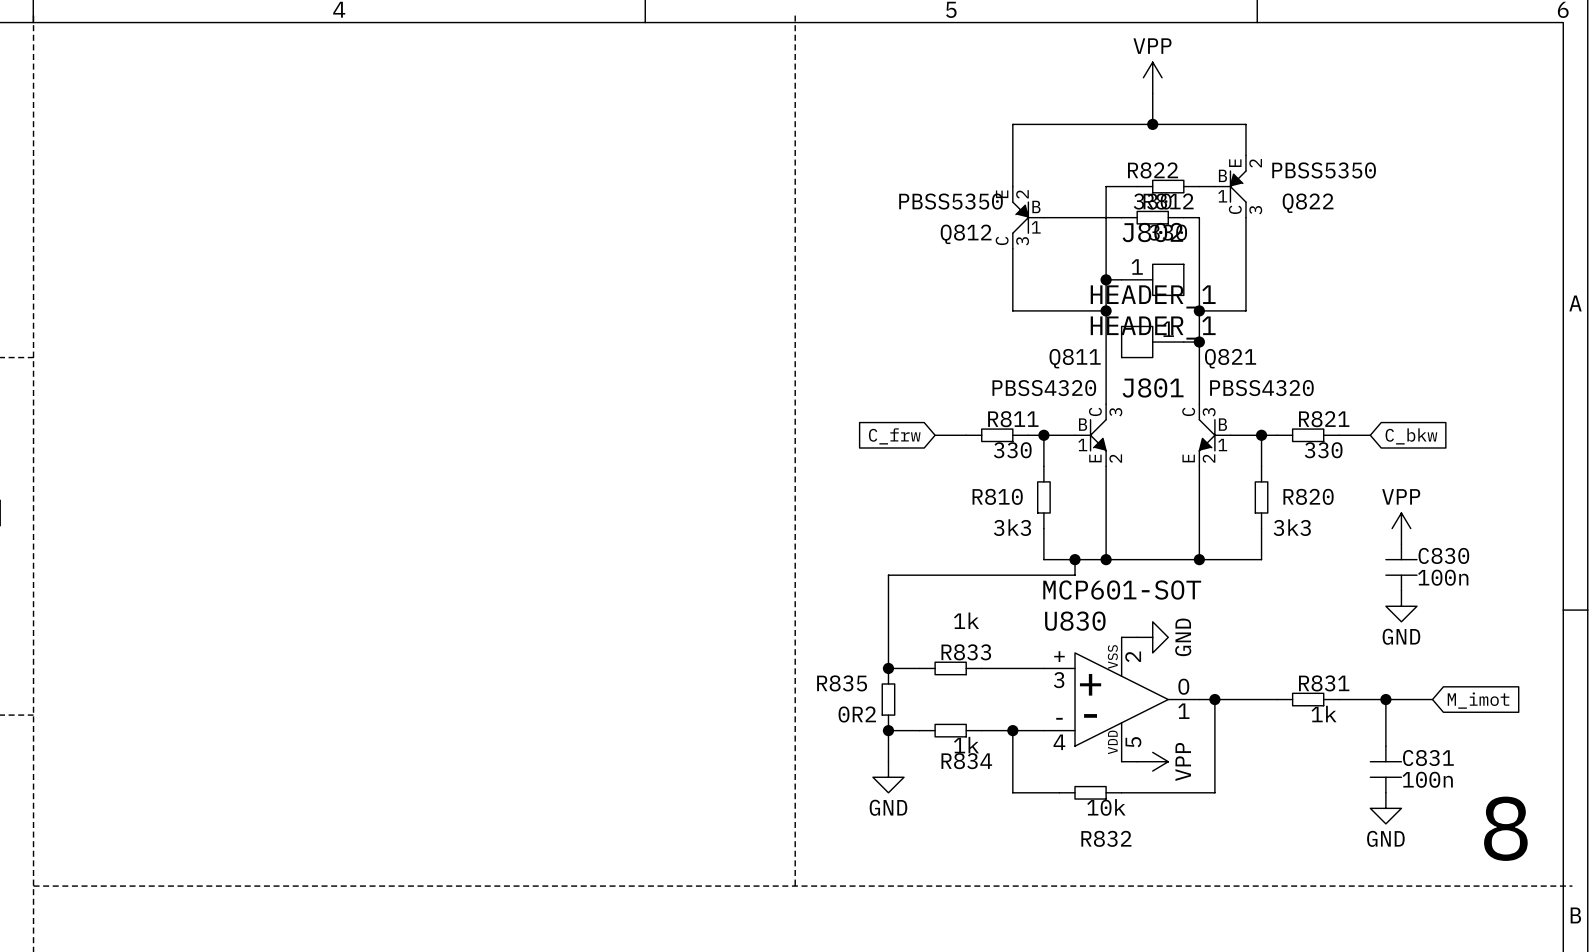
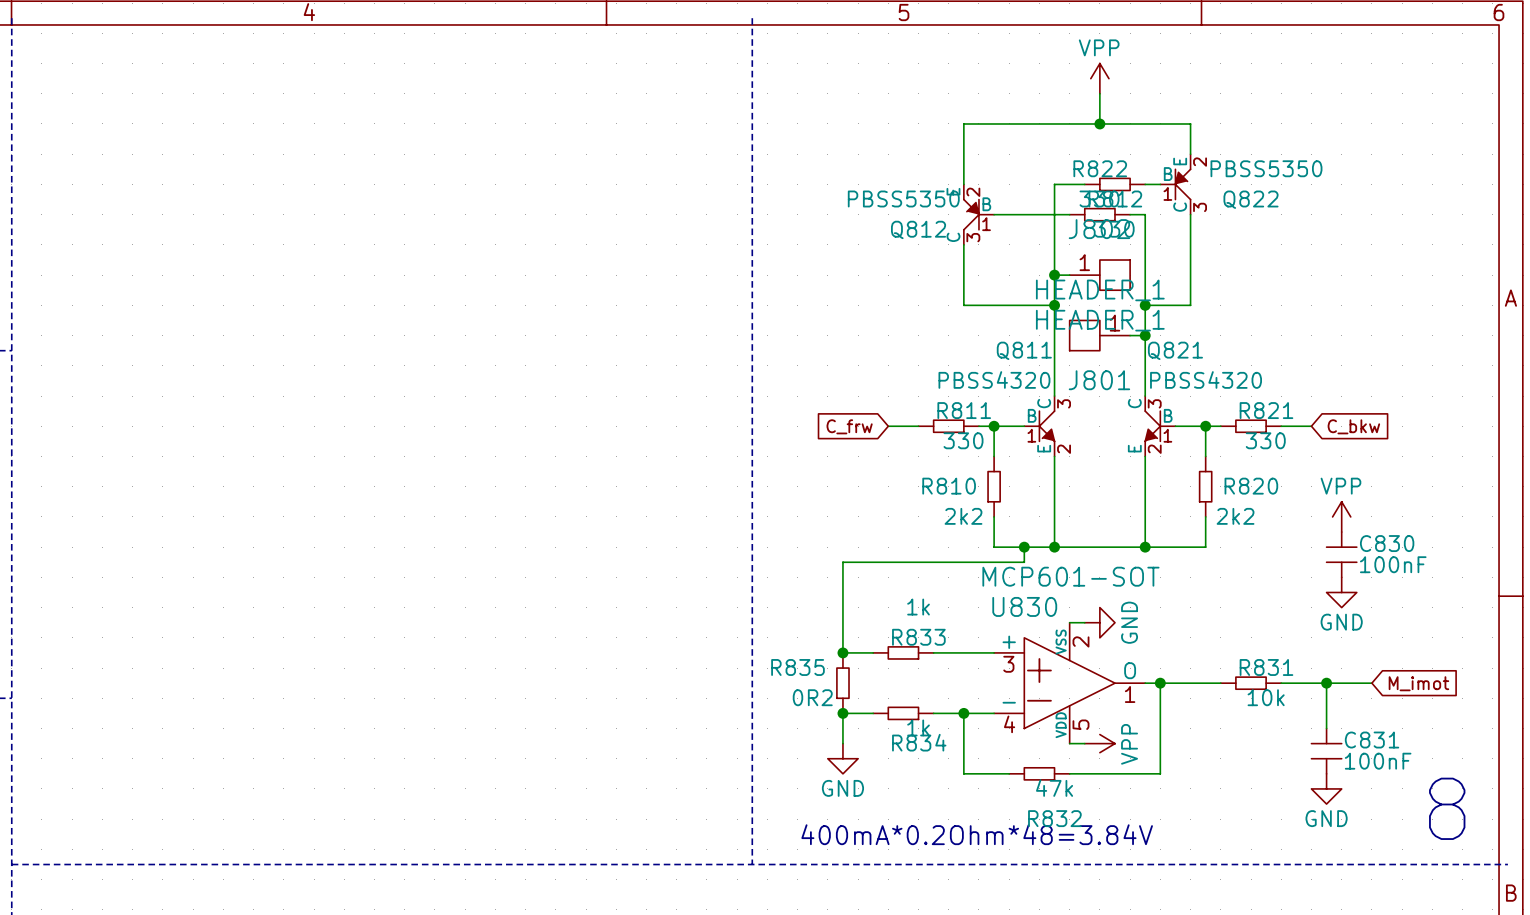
R810 value: 3k3 (1012, 527) -> 2k2 (963, 516)
R820 value: 3k3 (1292, 527) -> 2k2 (1235, 516)
C830 value: 100n (1443, 577) -> 100nF (1393, 564)
R831 value: 1k (1324, 714) -> 10k (1266, 697)
C831 value: 100n (1427, 779) -> 100nF (1378, 761)
R832 value: 10k (1106, 807) -> 47k (1054, 788)
text: none -> 400mA*0.2Ohm*48=3.84V (977, 834)

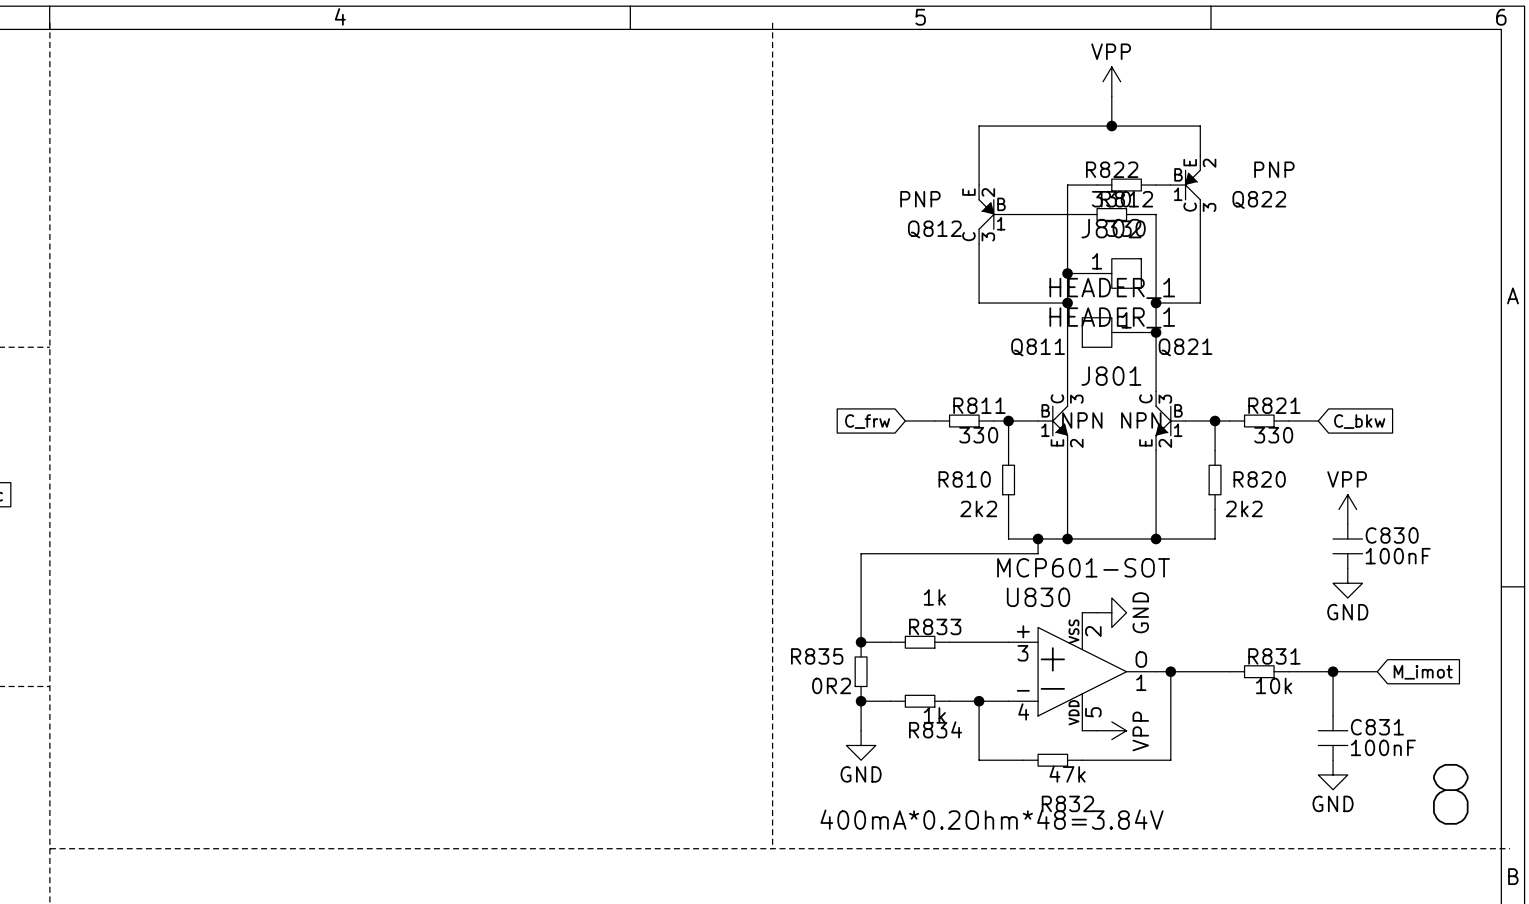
Q822 value: PBSS5350 (1266, 168) -> PNP (1274, 169)
Q812 value: PBSS5350 (903, 198) -> PNP (920, 199)
Q811 value: PBSS4320 (994, 379) -> NPN (1082, 420)
Q821 value: PBSS4320 (1206, 379) -> NPN (1141, 420)

